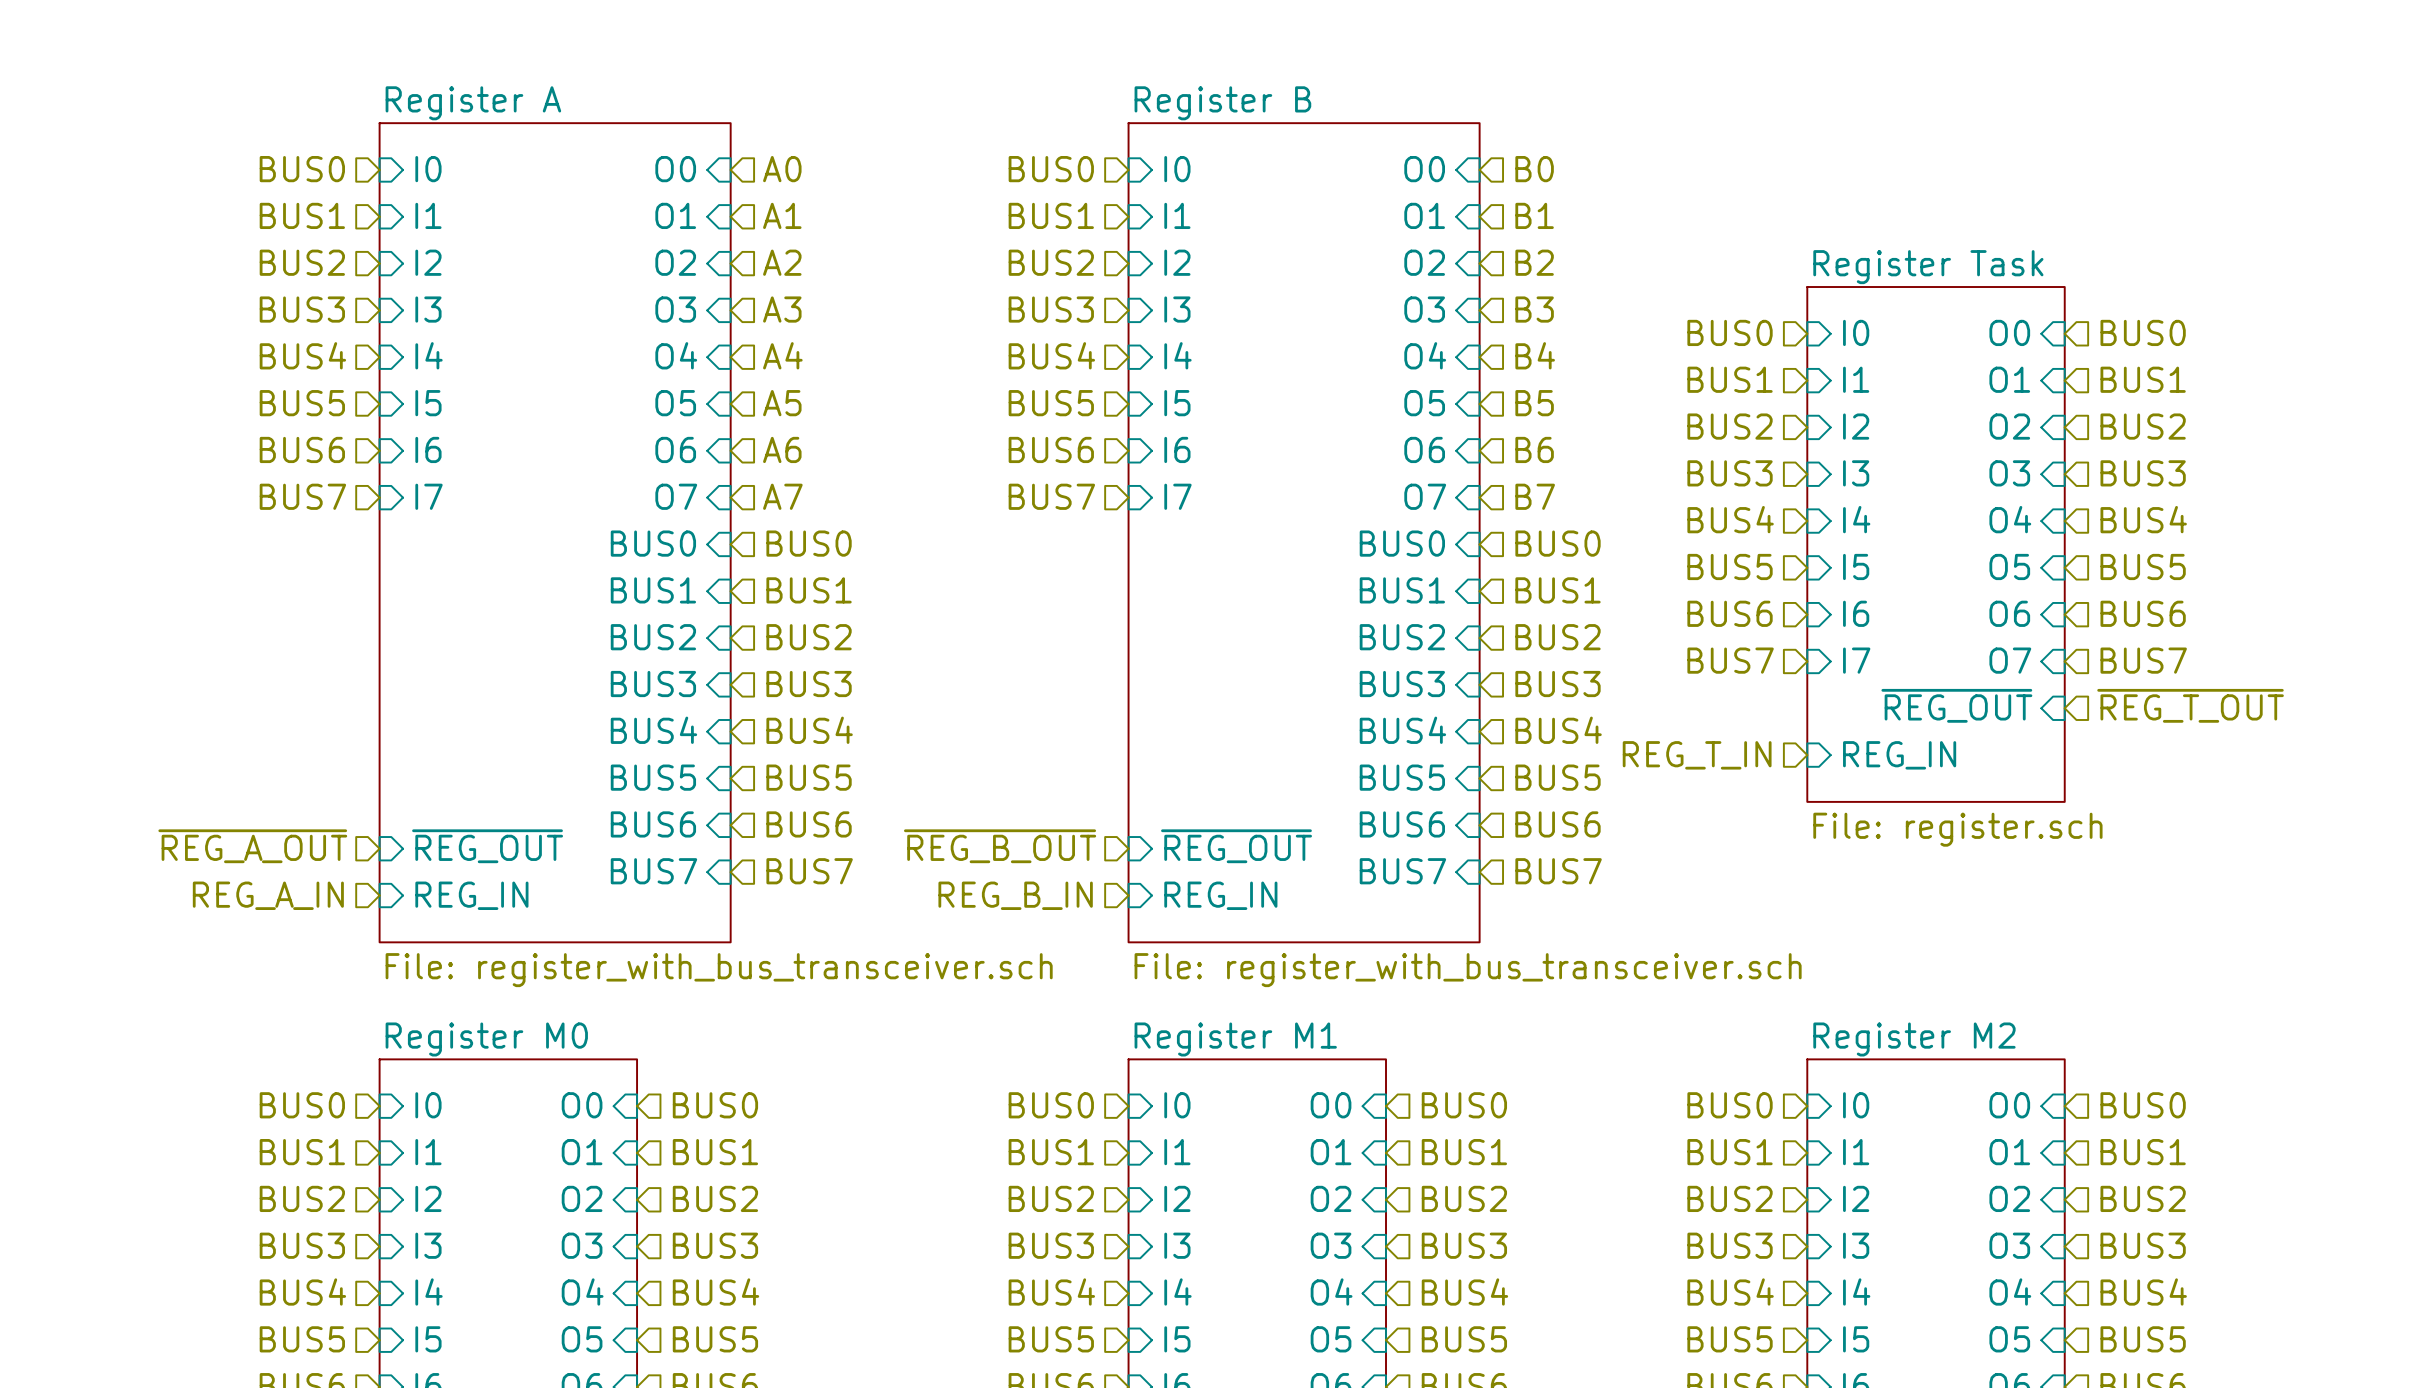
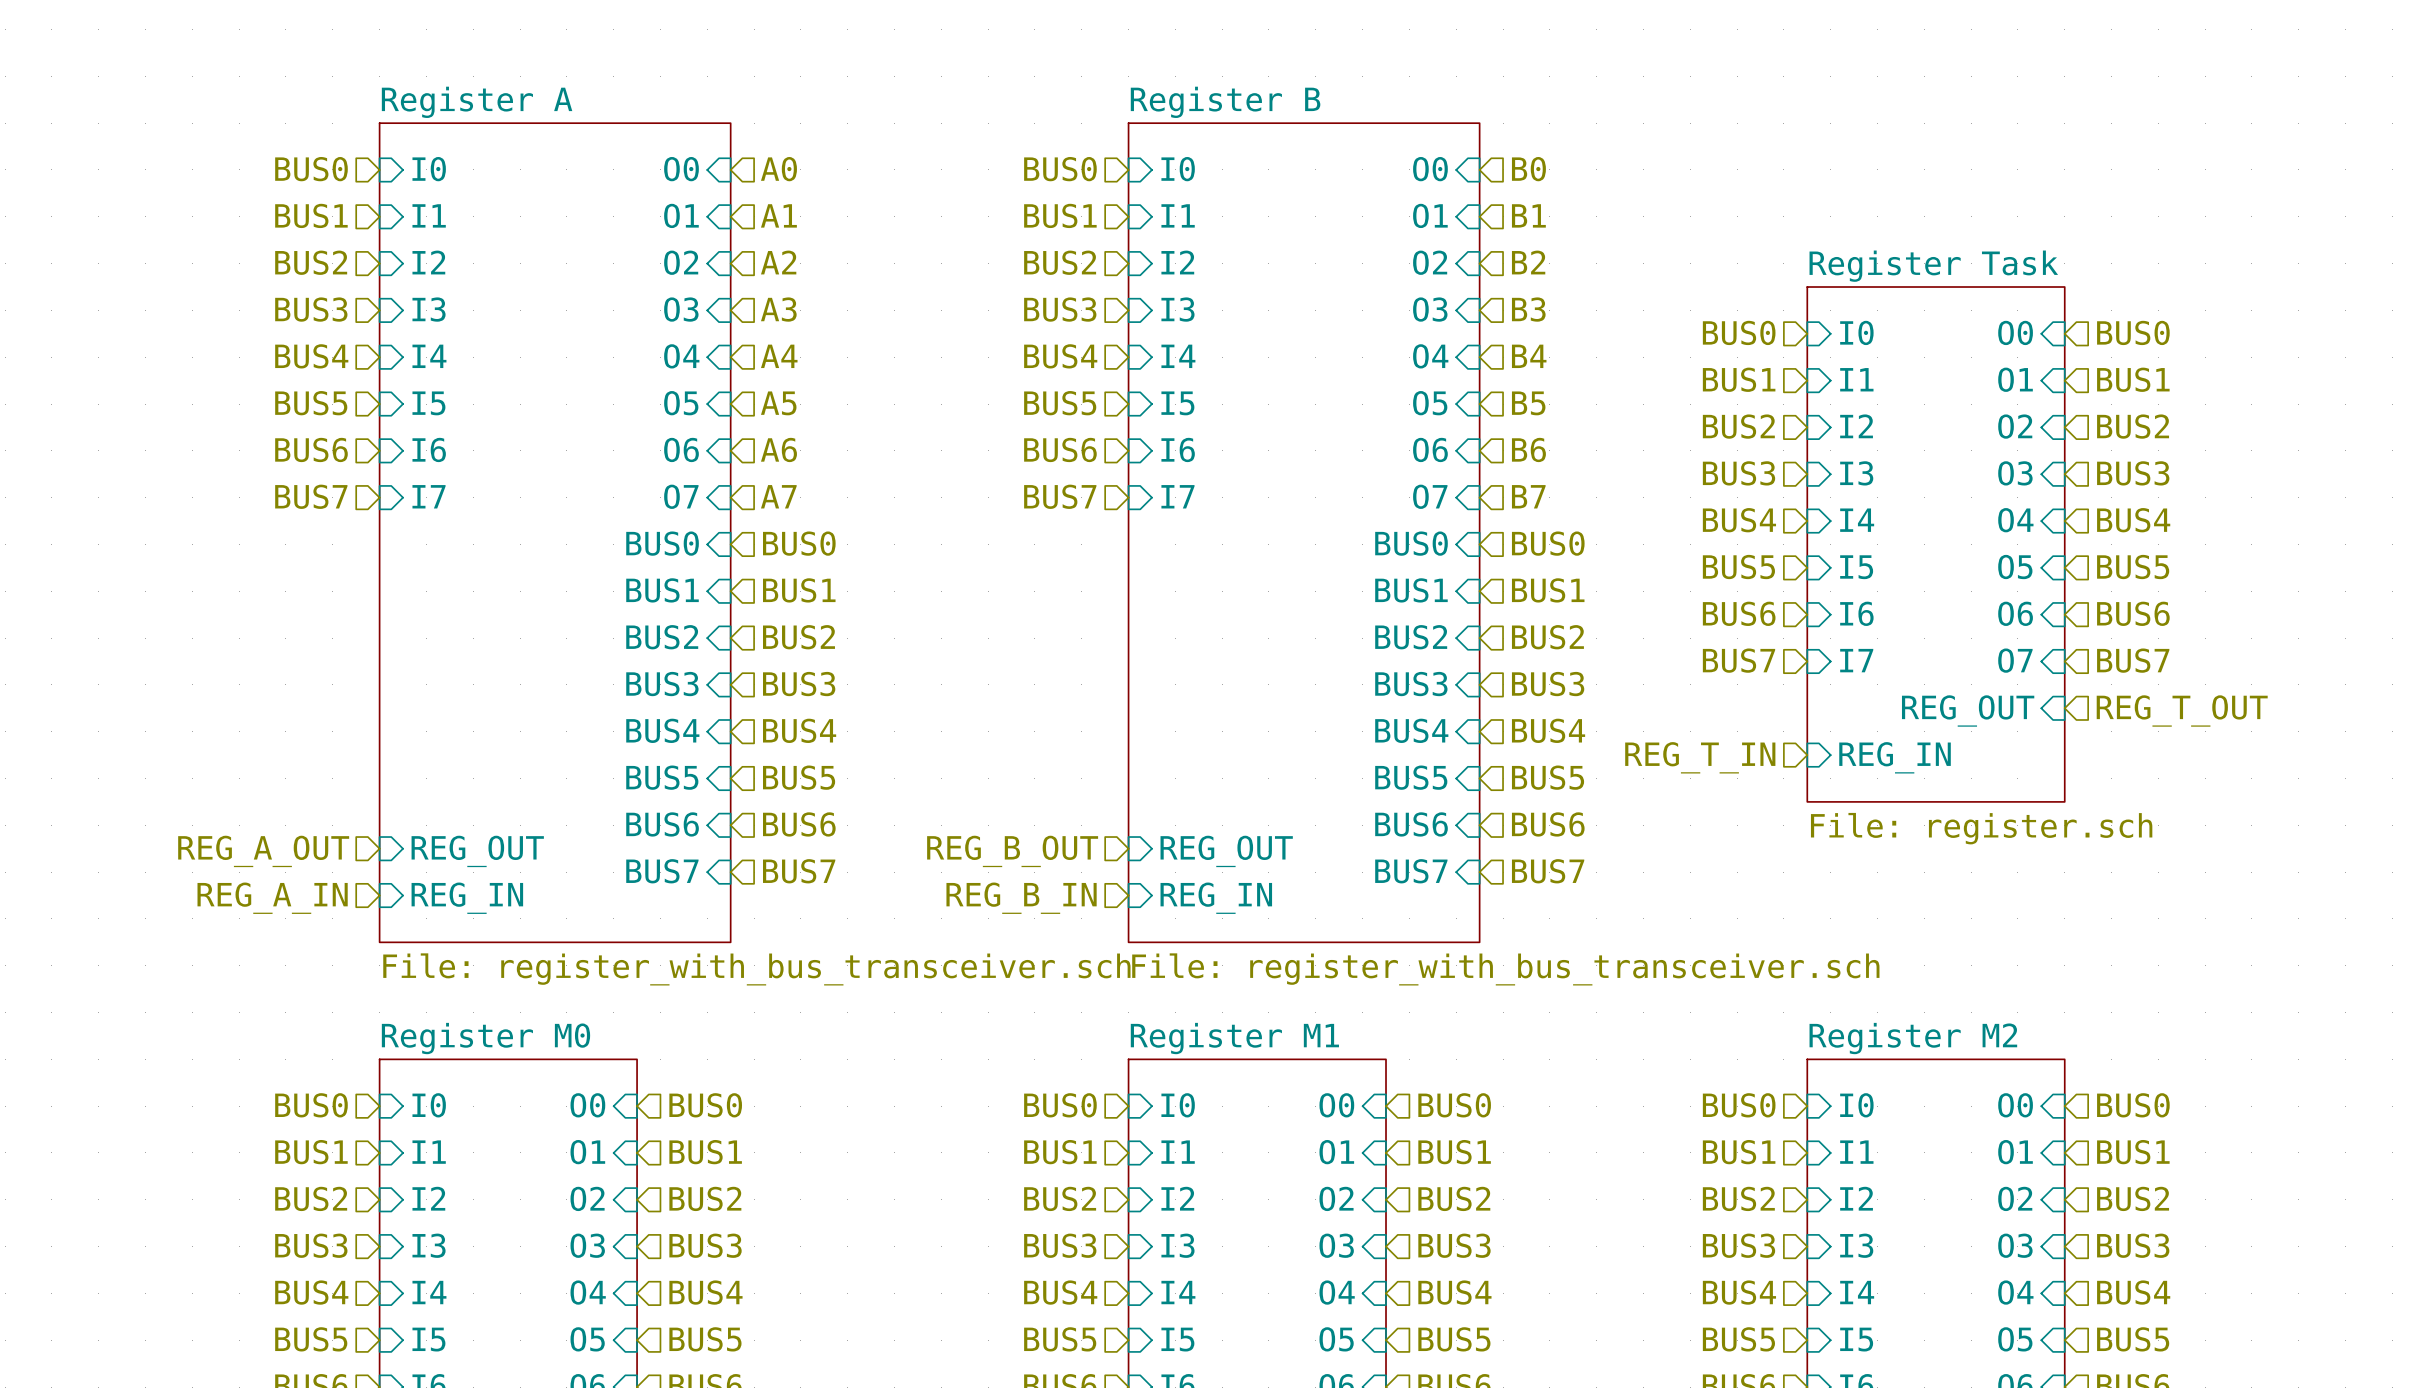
sheet pin: ~{REG_OUT} (1956, 705) -> REG_OUT (1968, 710)
hierarchical label: ~{REG_T_OUT} (2190, 705) -> REG_T_OUT (2182, 710)
hierarchical label: ~{REG_A_OUT} (252, 846) -> REG_A_OUT (263, 851)
sheet pin: ~{REG_OUT} (487, 846) -> REG_OUT (477, 851)
hierarchical label: ~{REG_B_OUT} (1000, 846) -> REG_B_OUT (1012, 851)
sheet pin: ~{REG_OUT} (1236, 846) -> REG_OUT (1226, 851)

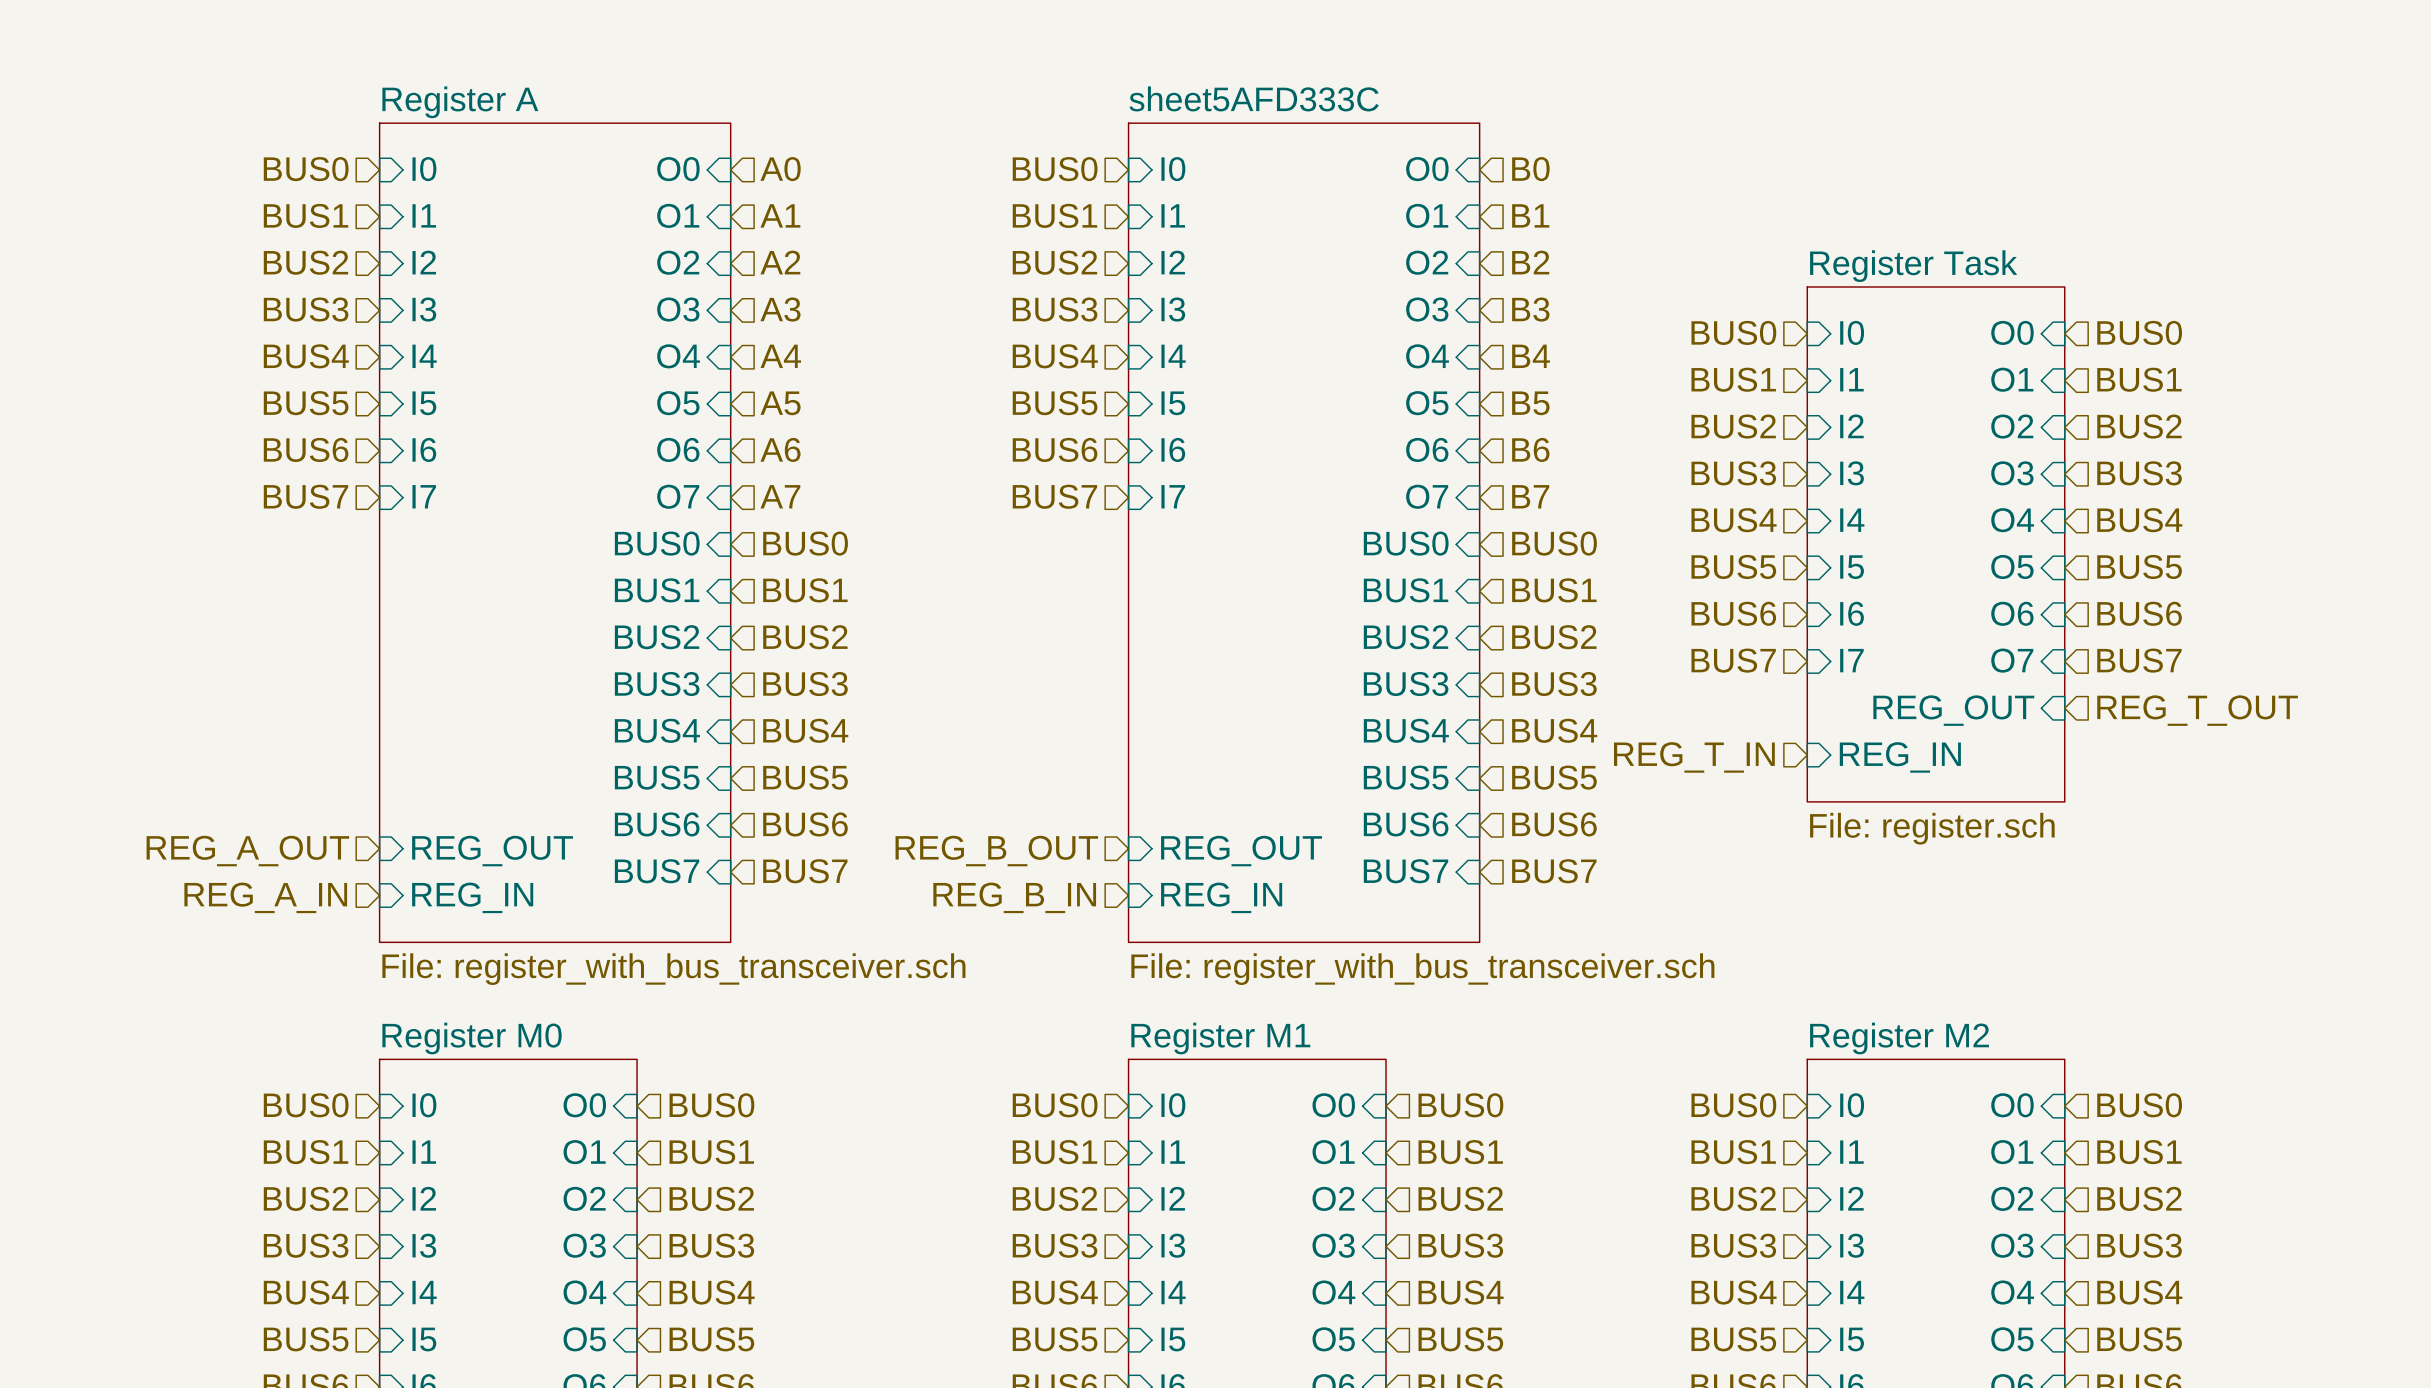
sheet Register B name: Register B (1225, 102) -> sheet5AFD333C (1254, 98)

